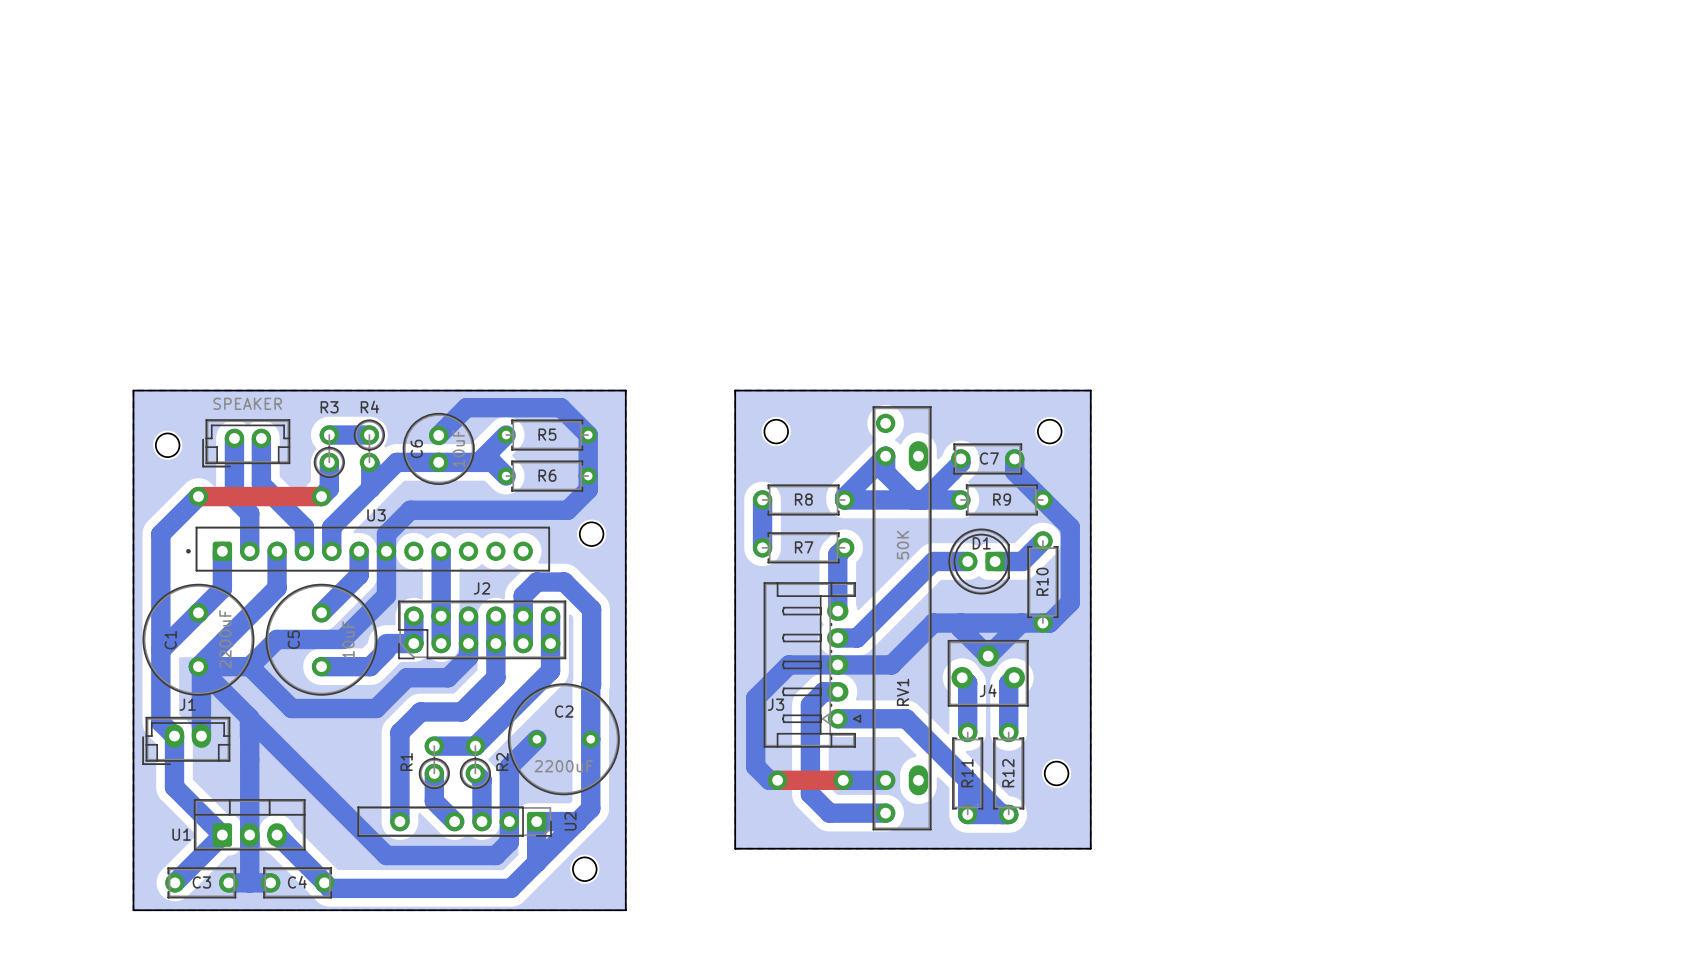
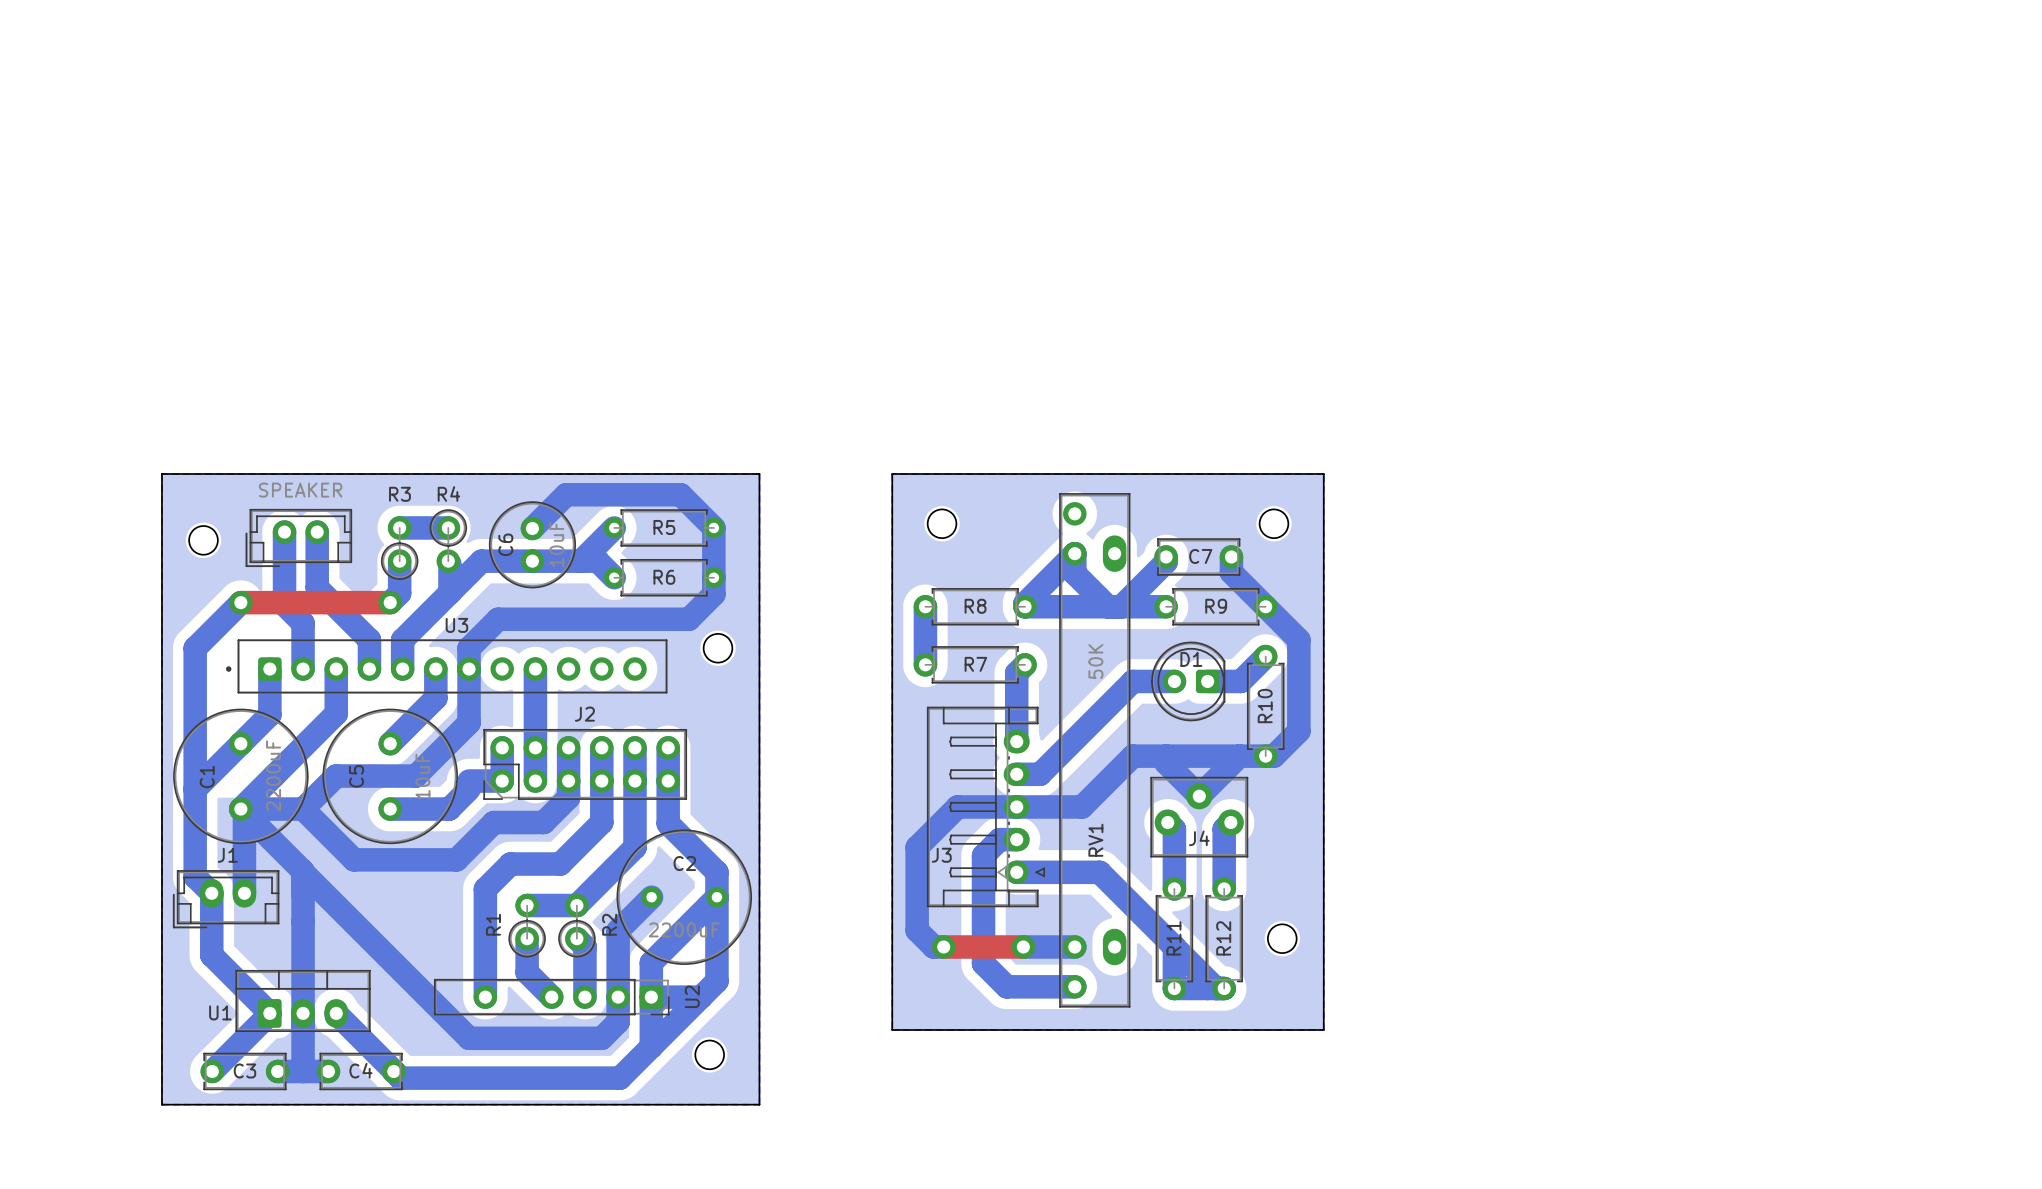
bottom track: (523, 616) (523, 595) (536, 582) (564, 582) (591, 609) (590, 718) -> (668, 814) (668, 823) (716, 872)
bottom track: (550, 670) (523, 698) -> (635, 781) (635, 847)
bottom track: none -> (716, 897) (651, 962) (651, 997)

